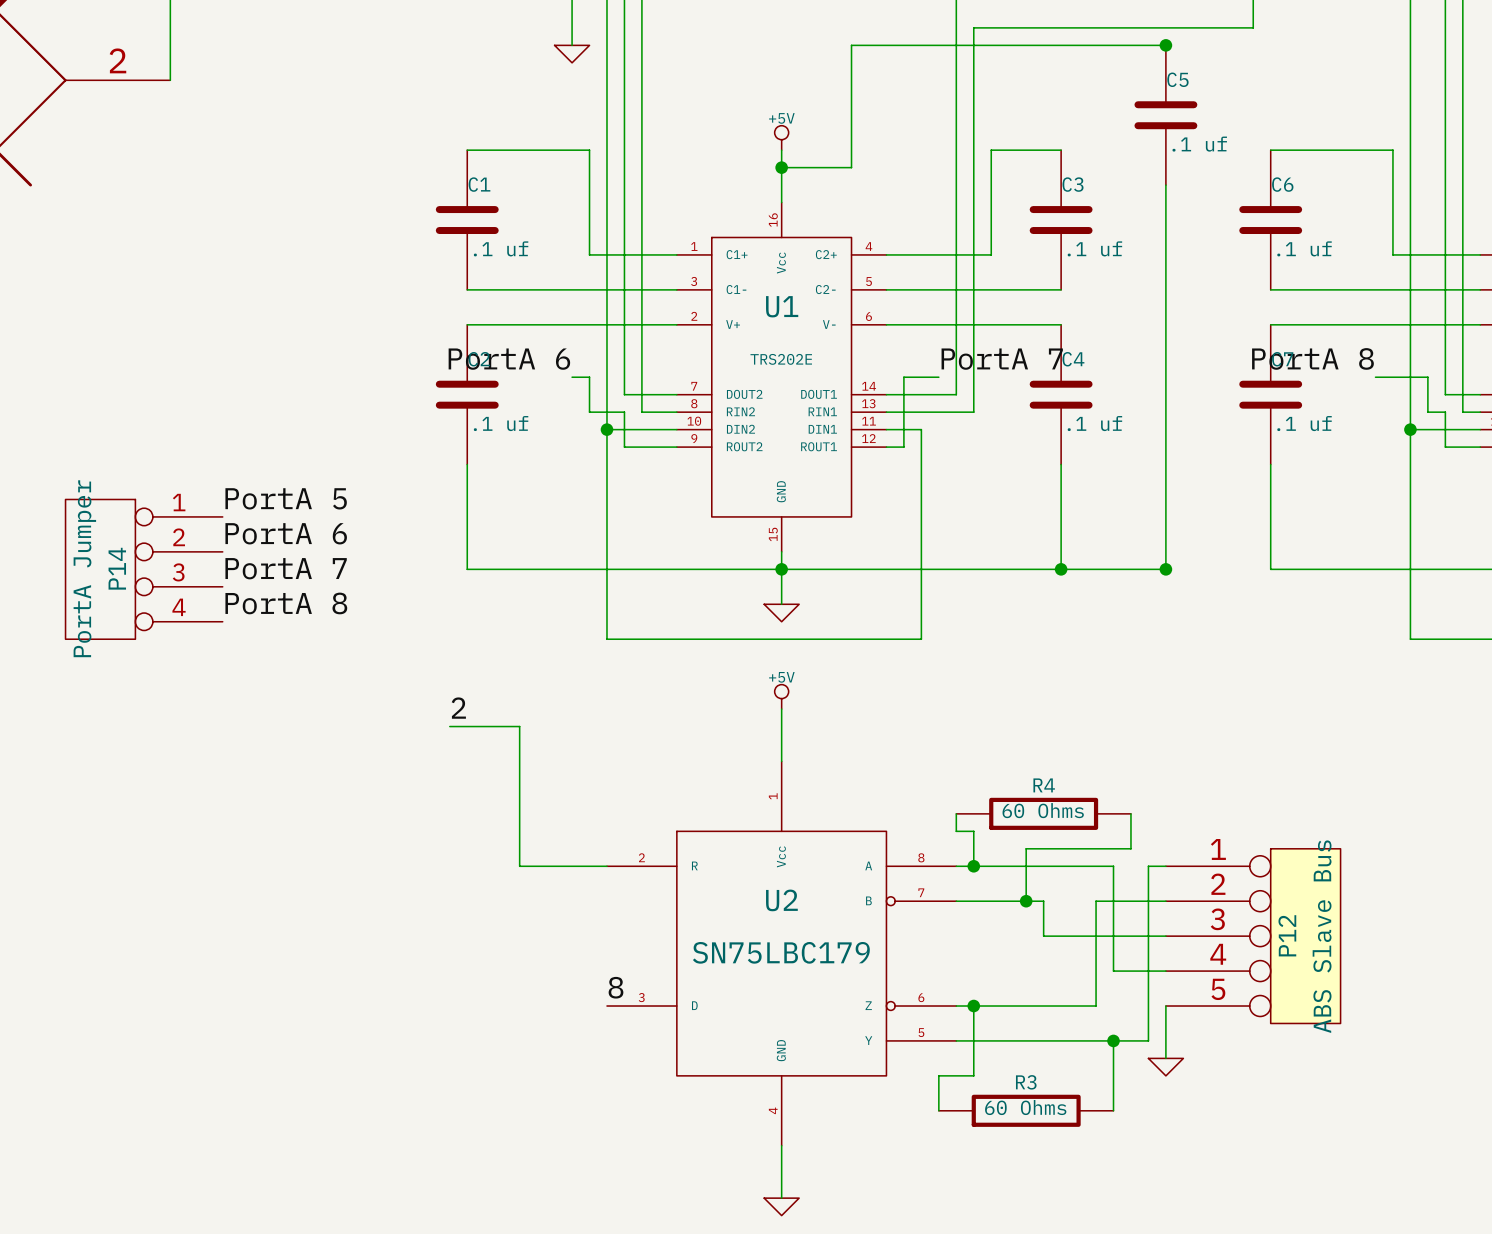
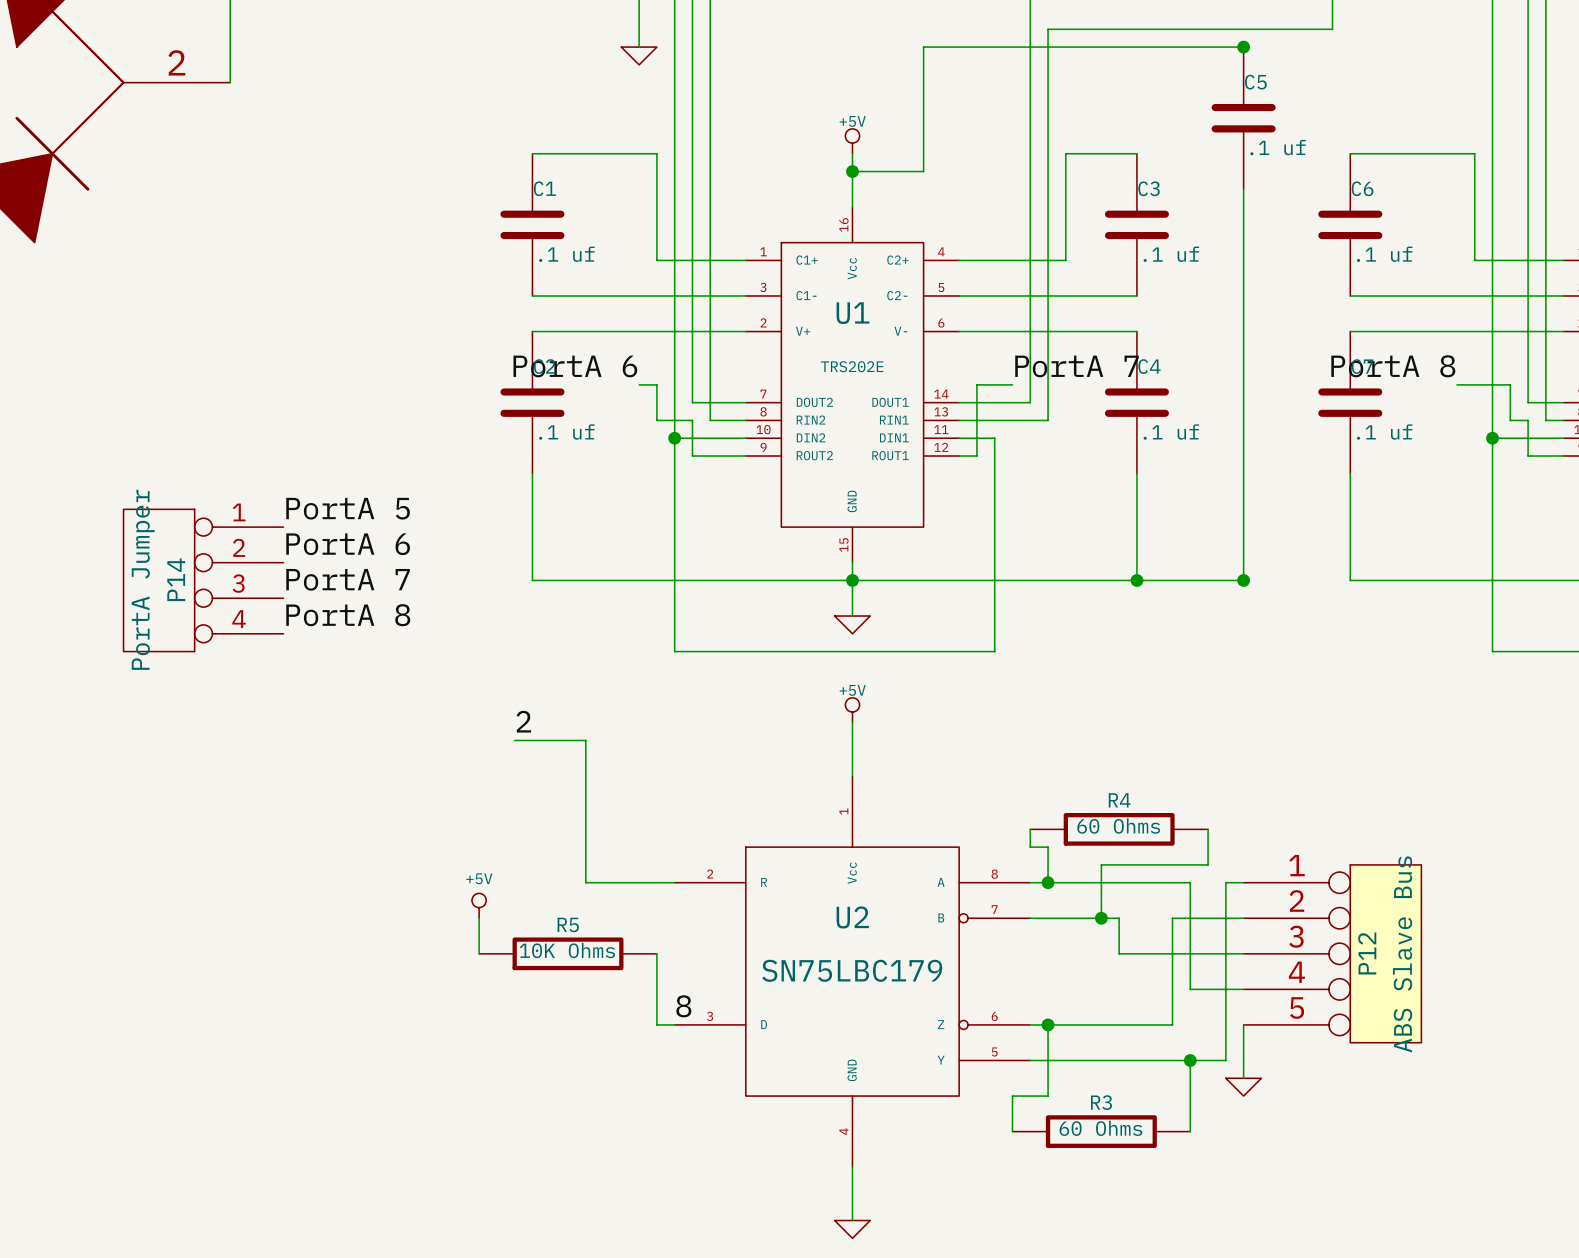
power symbol: none -> +5V (479, 905)
wire: none -> (479, 918) (479, 953)
R5: none -> 10K Ohms (568, 953)
wire: none -> (656, 953) (656, 1024) (674, 1024)

